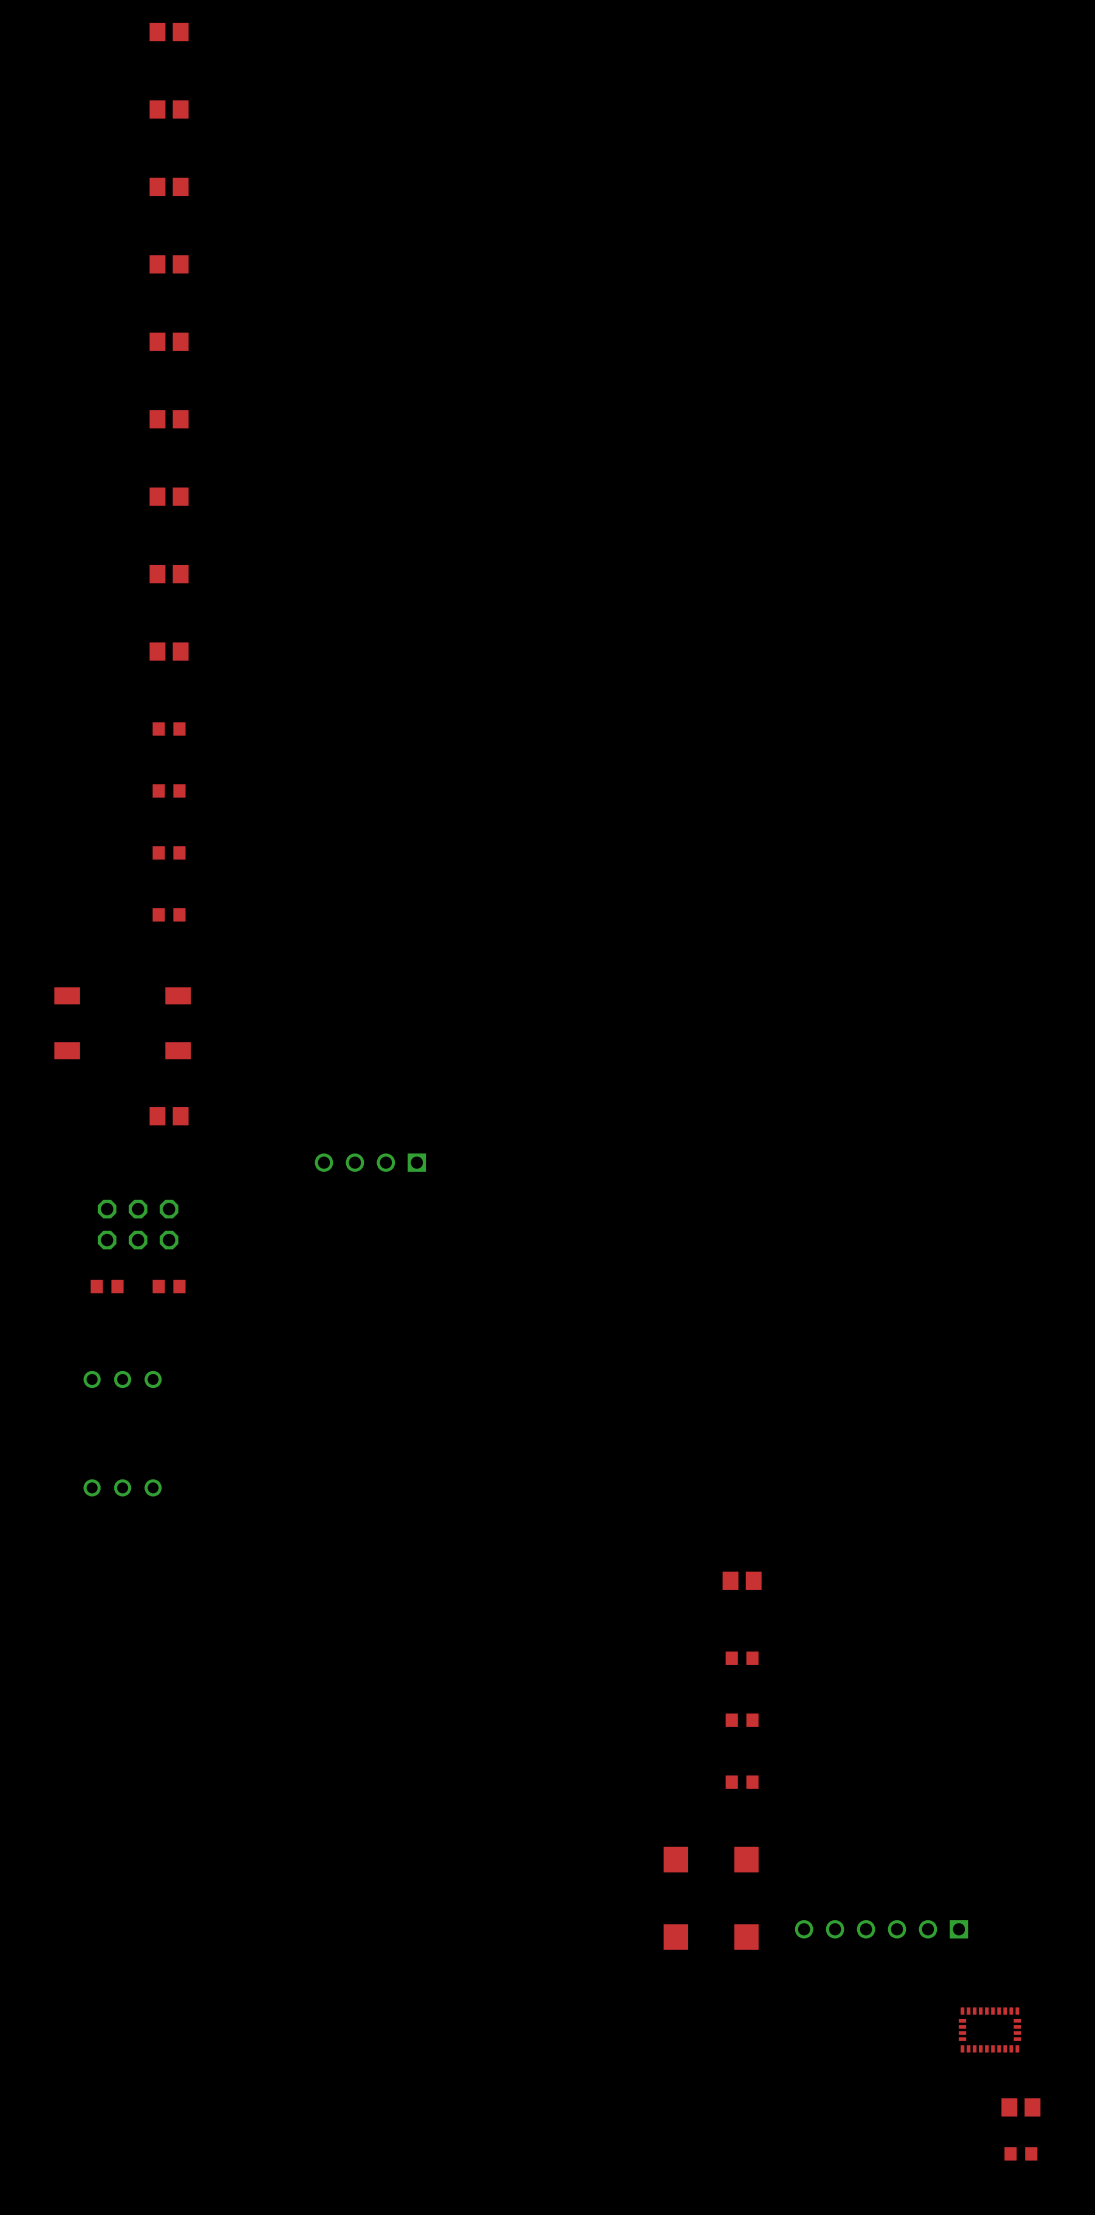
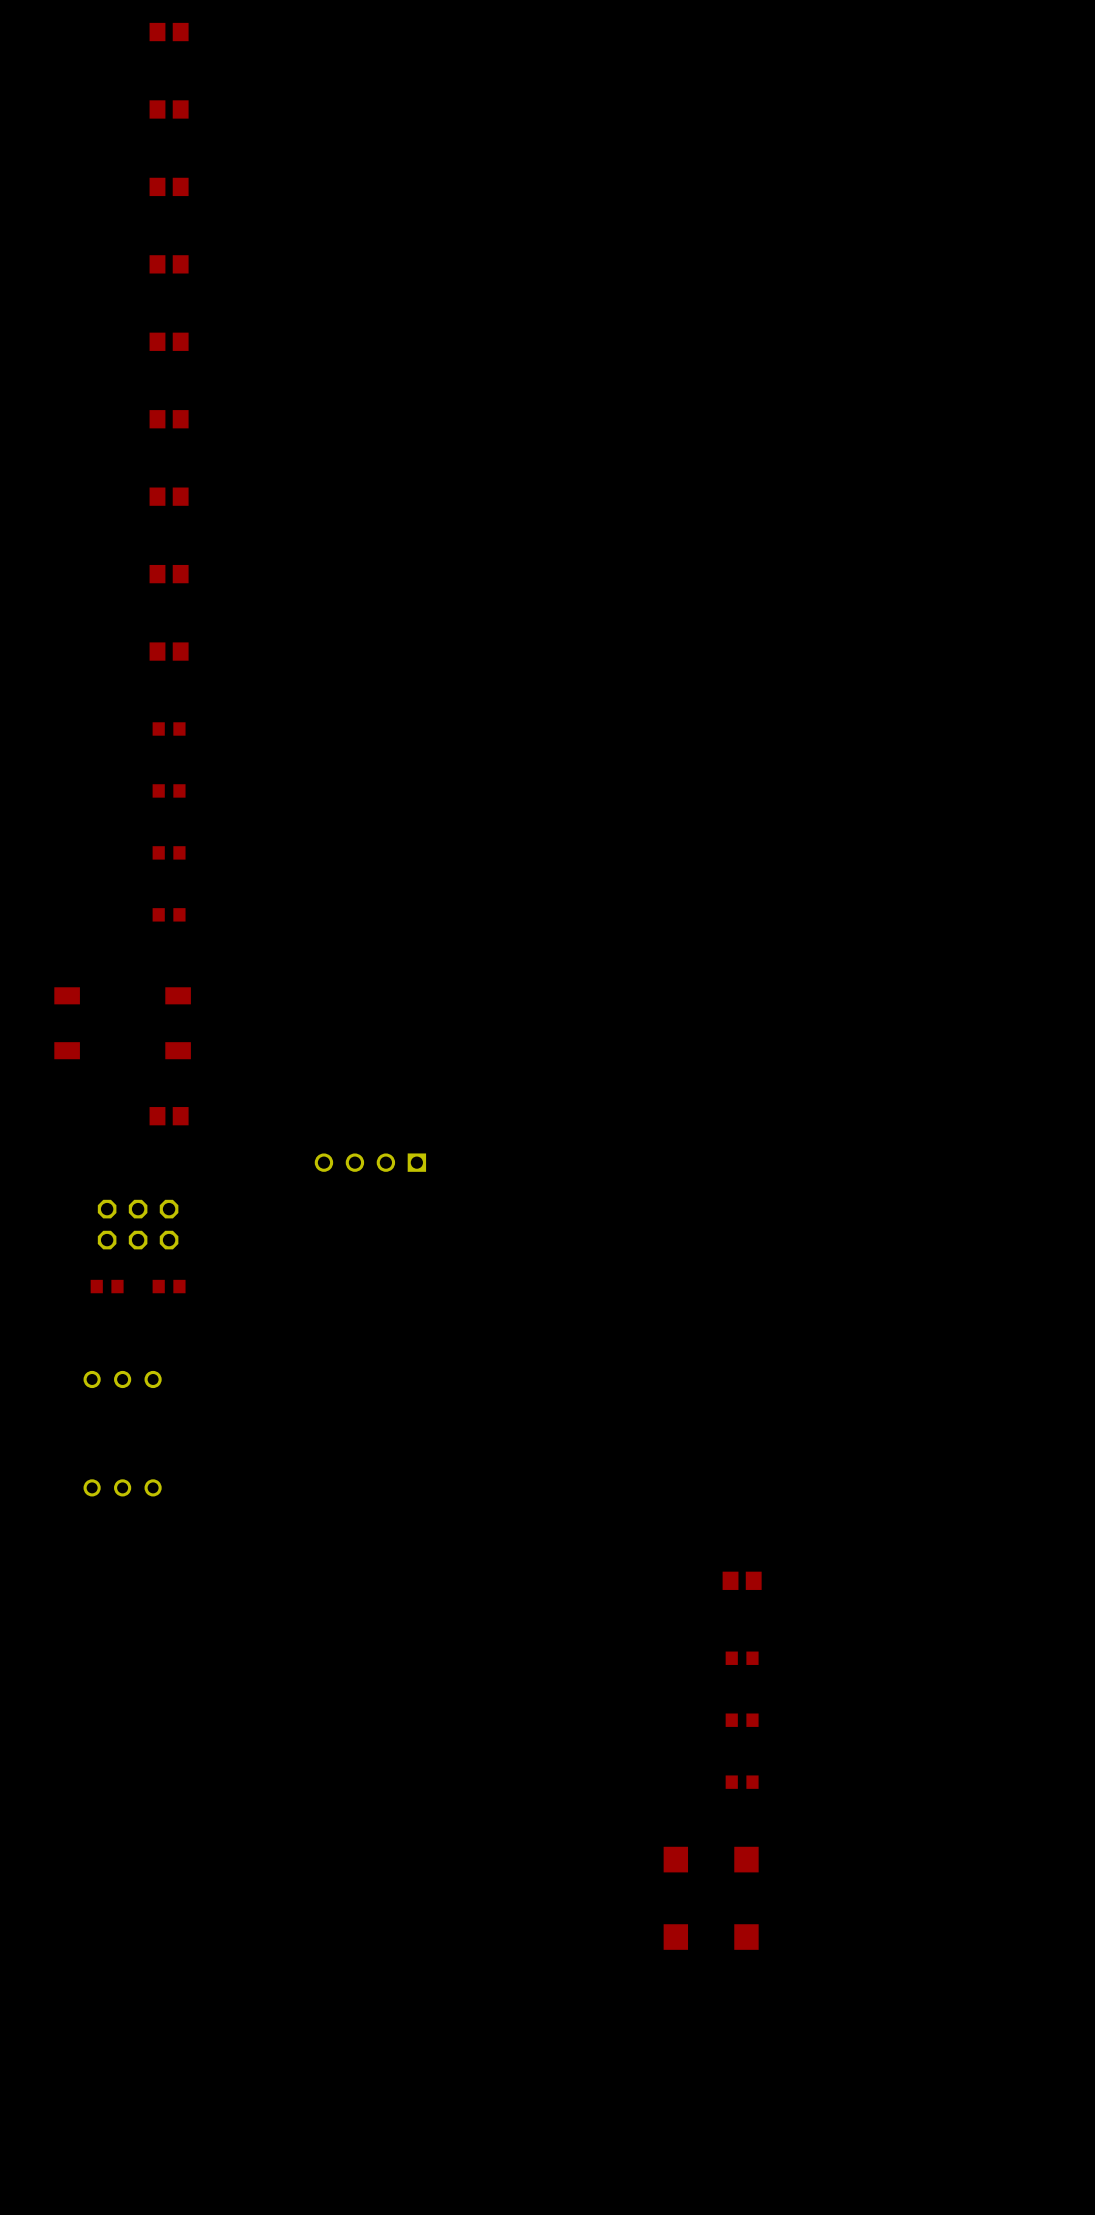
part: (881, 1929) -> none
part: (989, 2029) -> none
part: (1020, 2107) -> none
part: (1020, 2153) -> none

